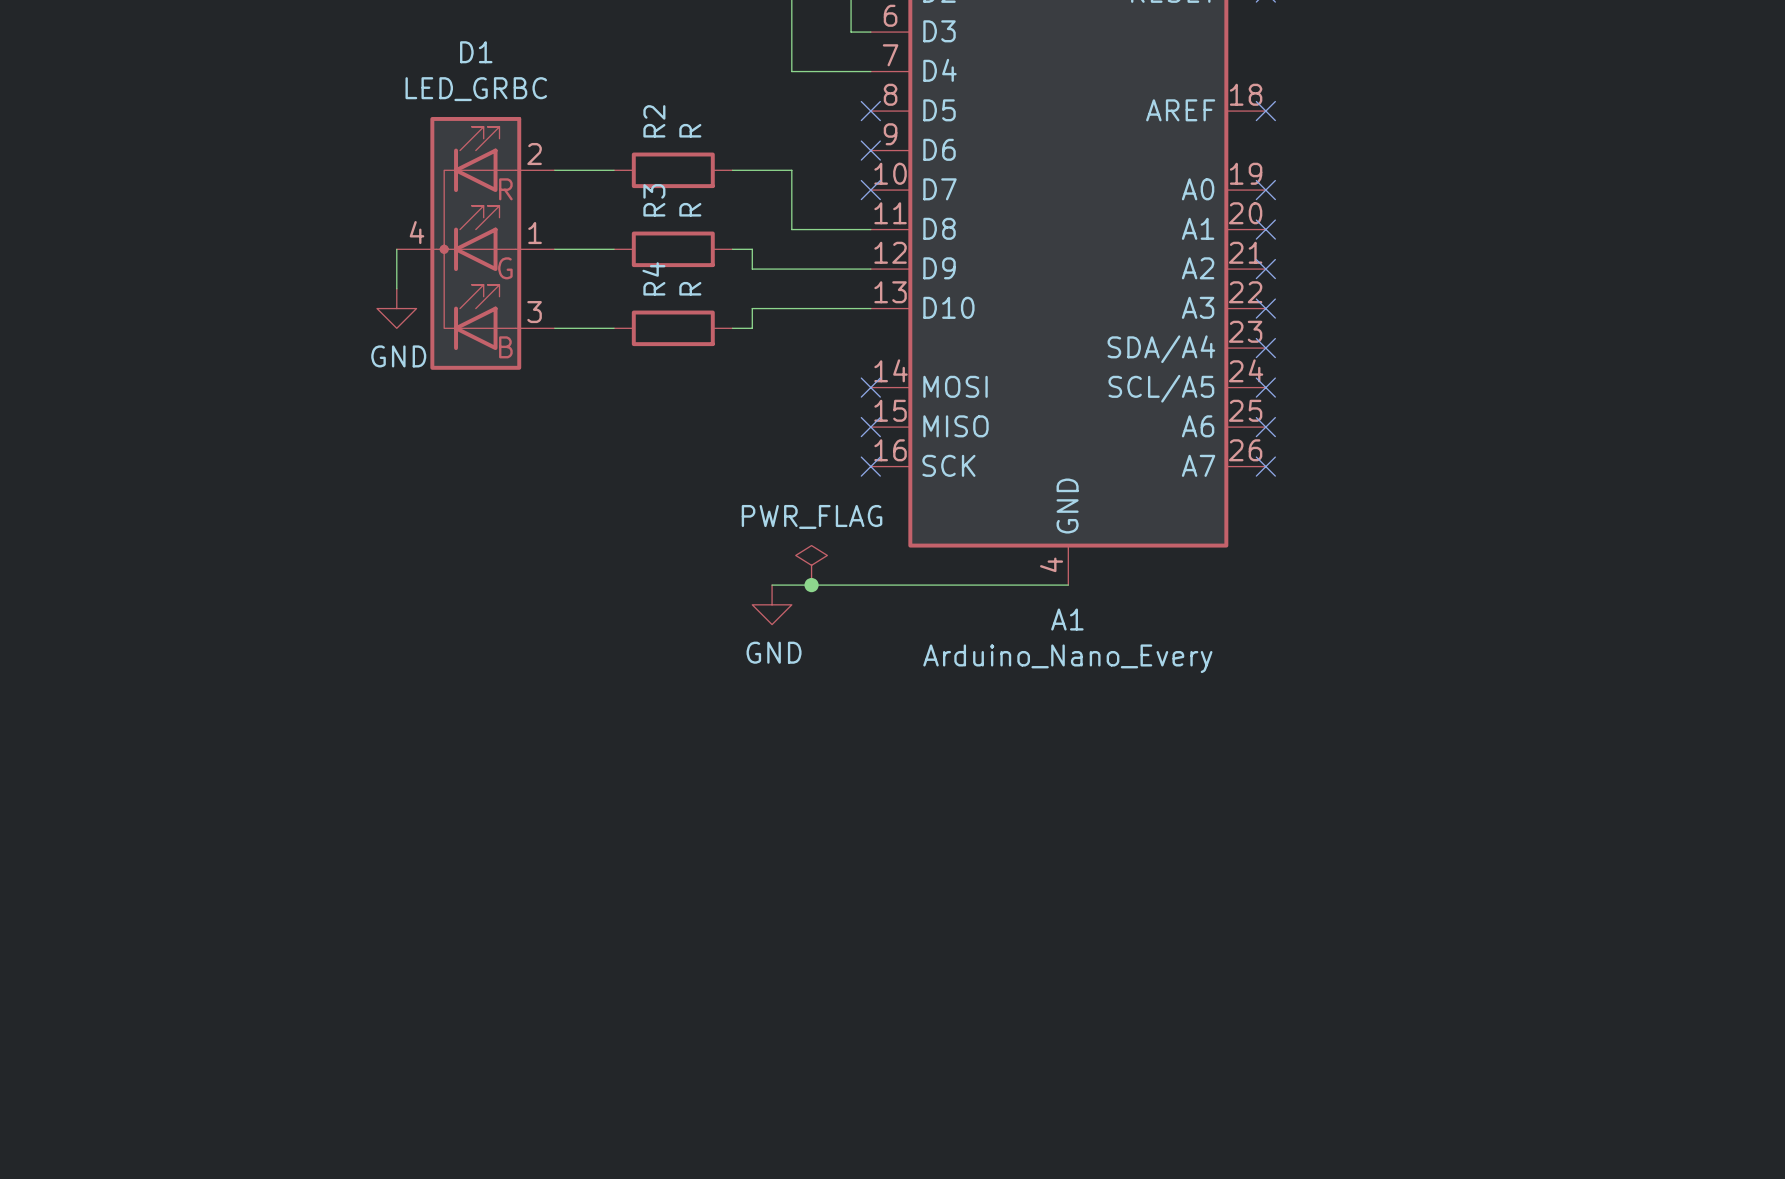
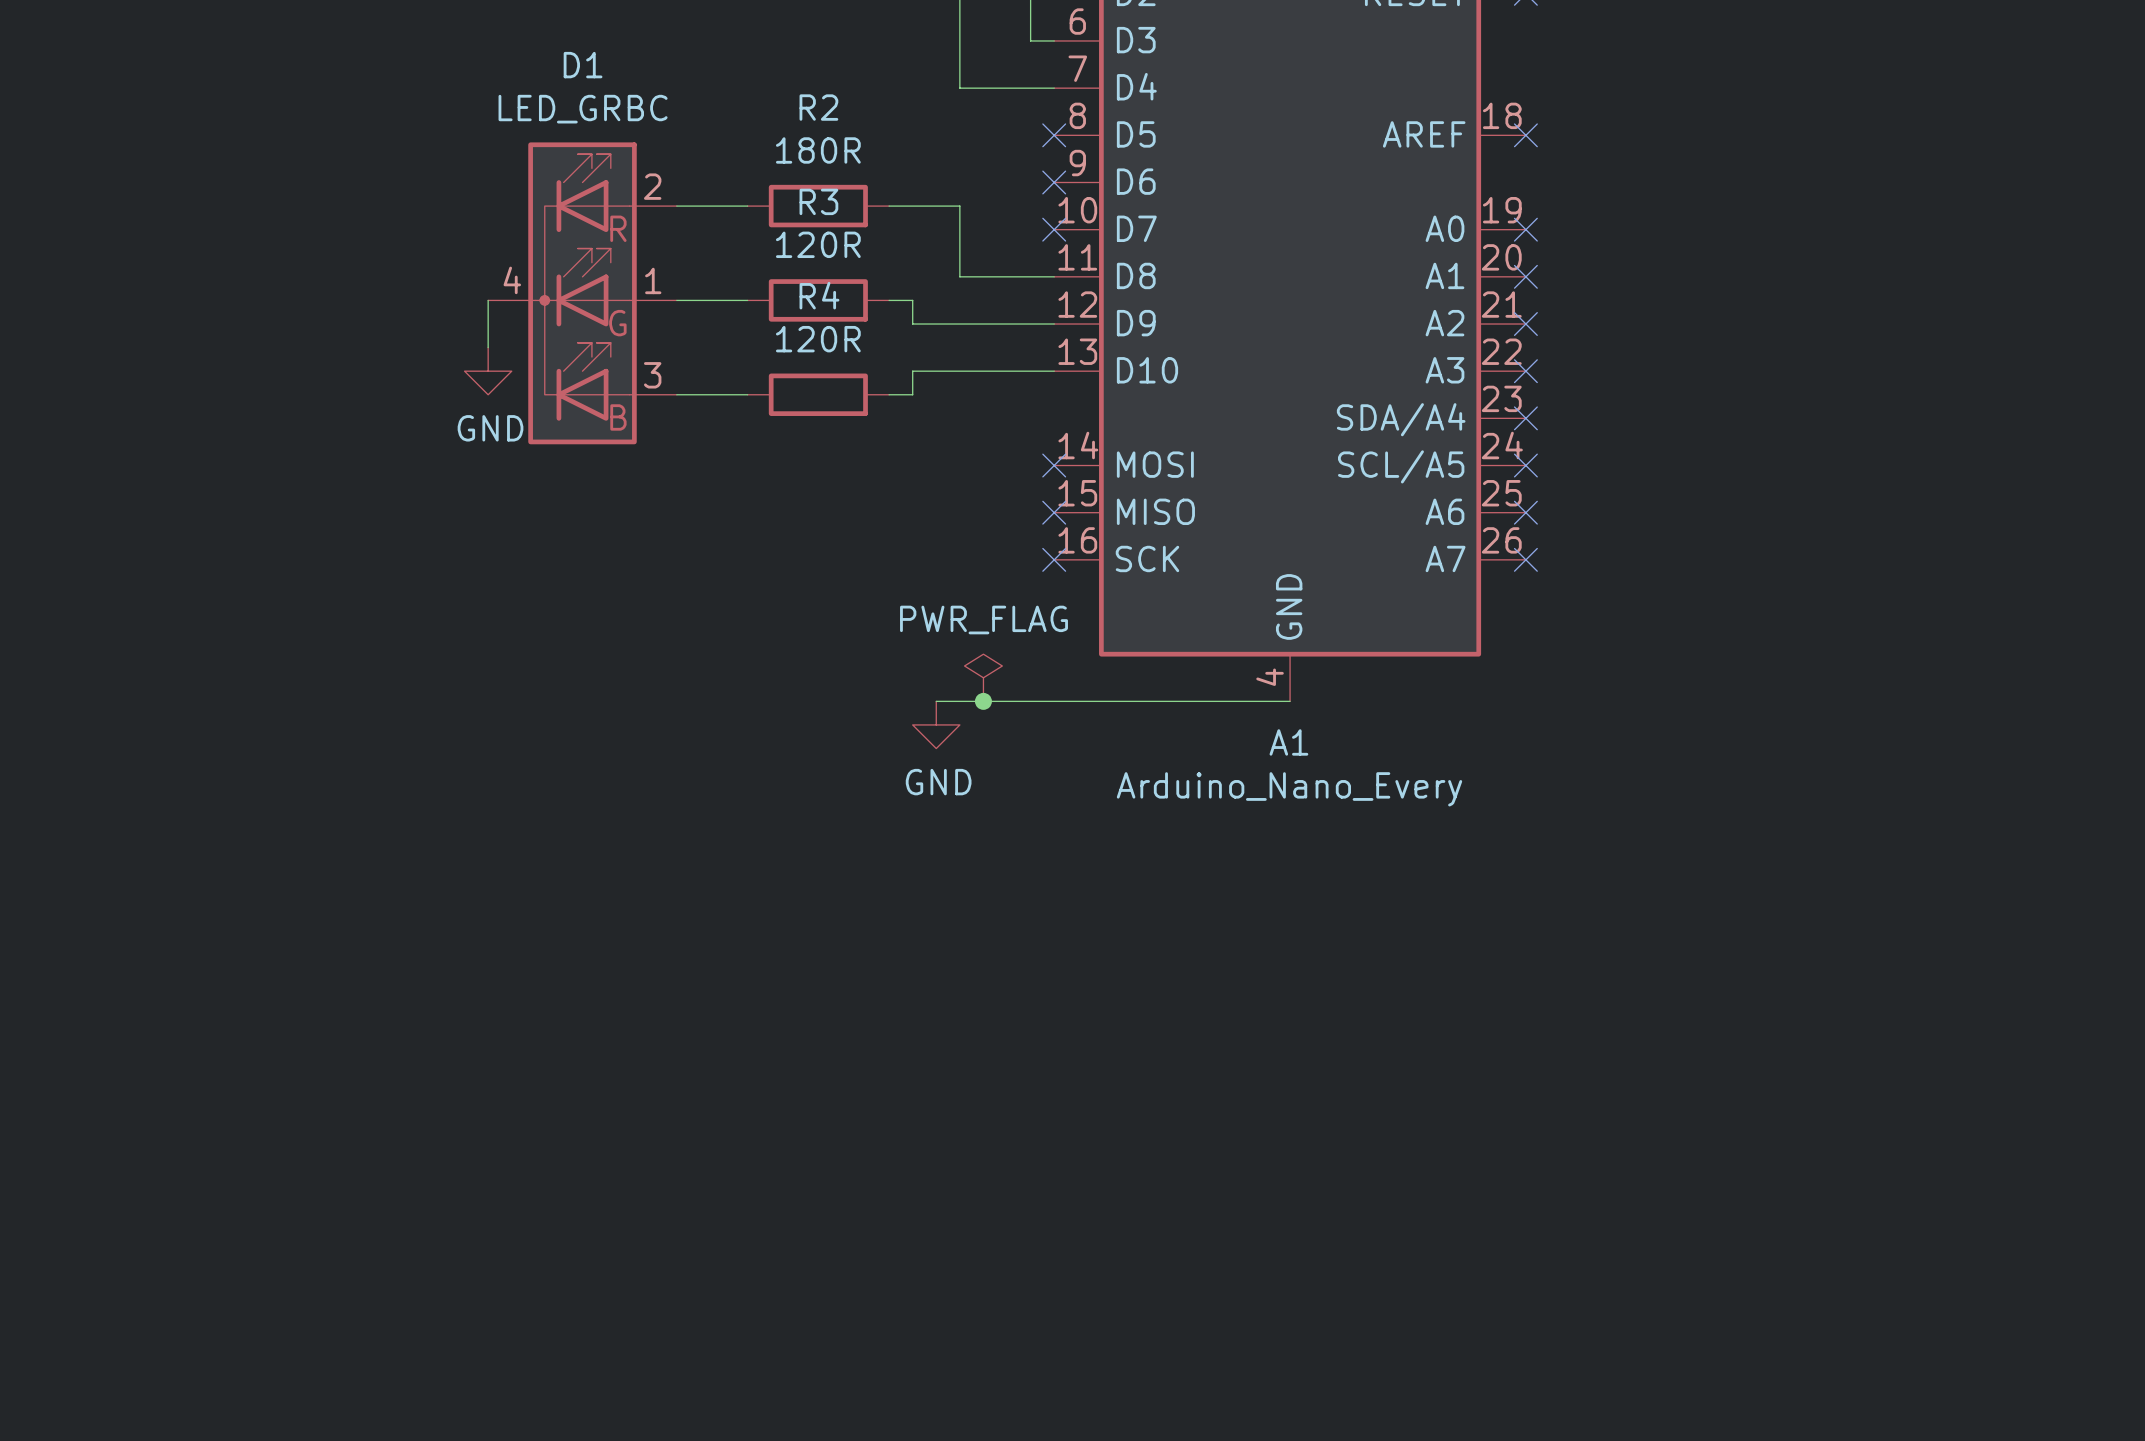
R2 name rotation: 0° (654, 121) -> 90° clockwise (818, 107)
R2 value: R (690, 130) -> 180R (818, 150)
R3 name rotation: 0° (654, 200) -> 90° clockwise (818, 201)
R3 value: R (690, 209) -> 120R (818, 244)
R4 name rotation: 0° (653, 278) -> 90° clockwise (819, 295)
R4 value: R (690, 288) -> 120R (818, 339)

